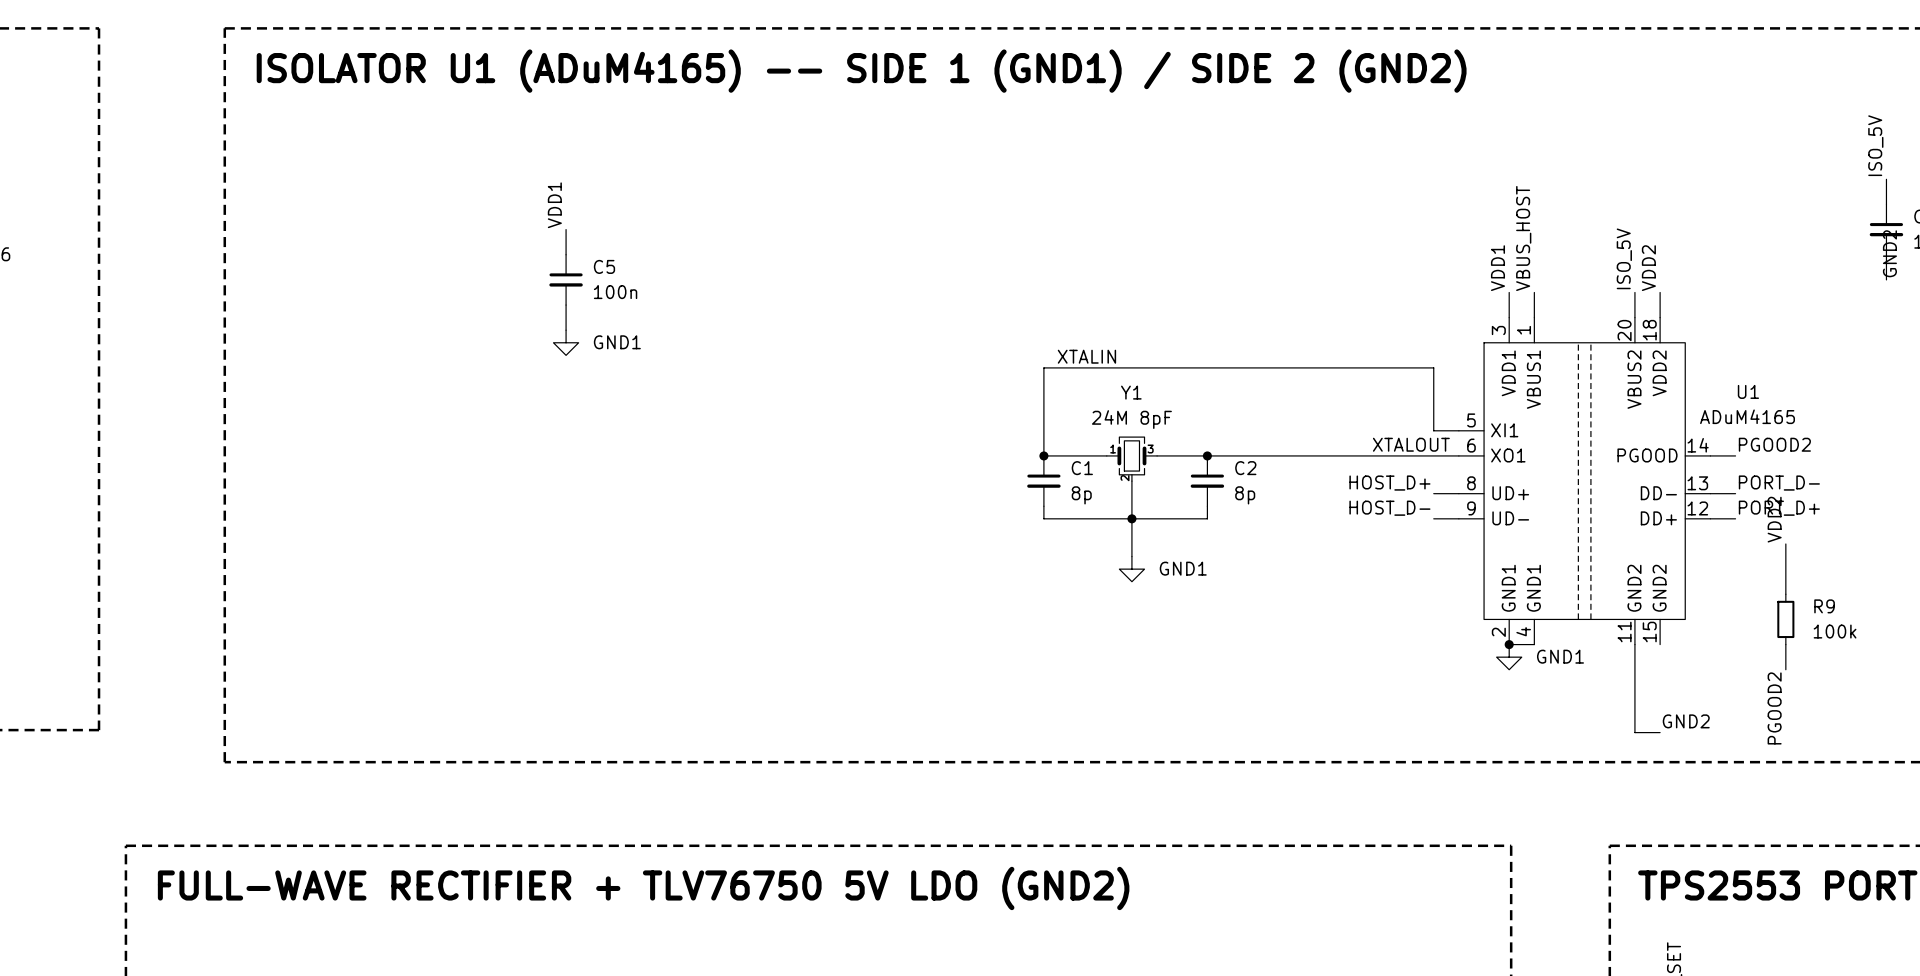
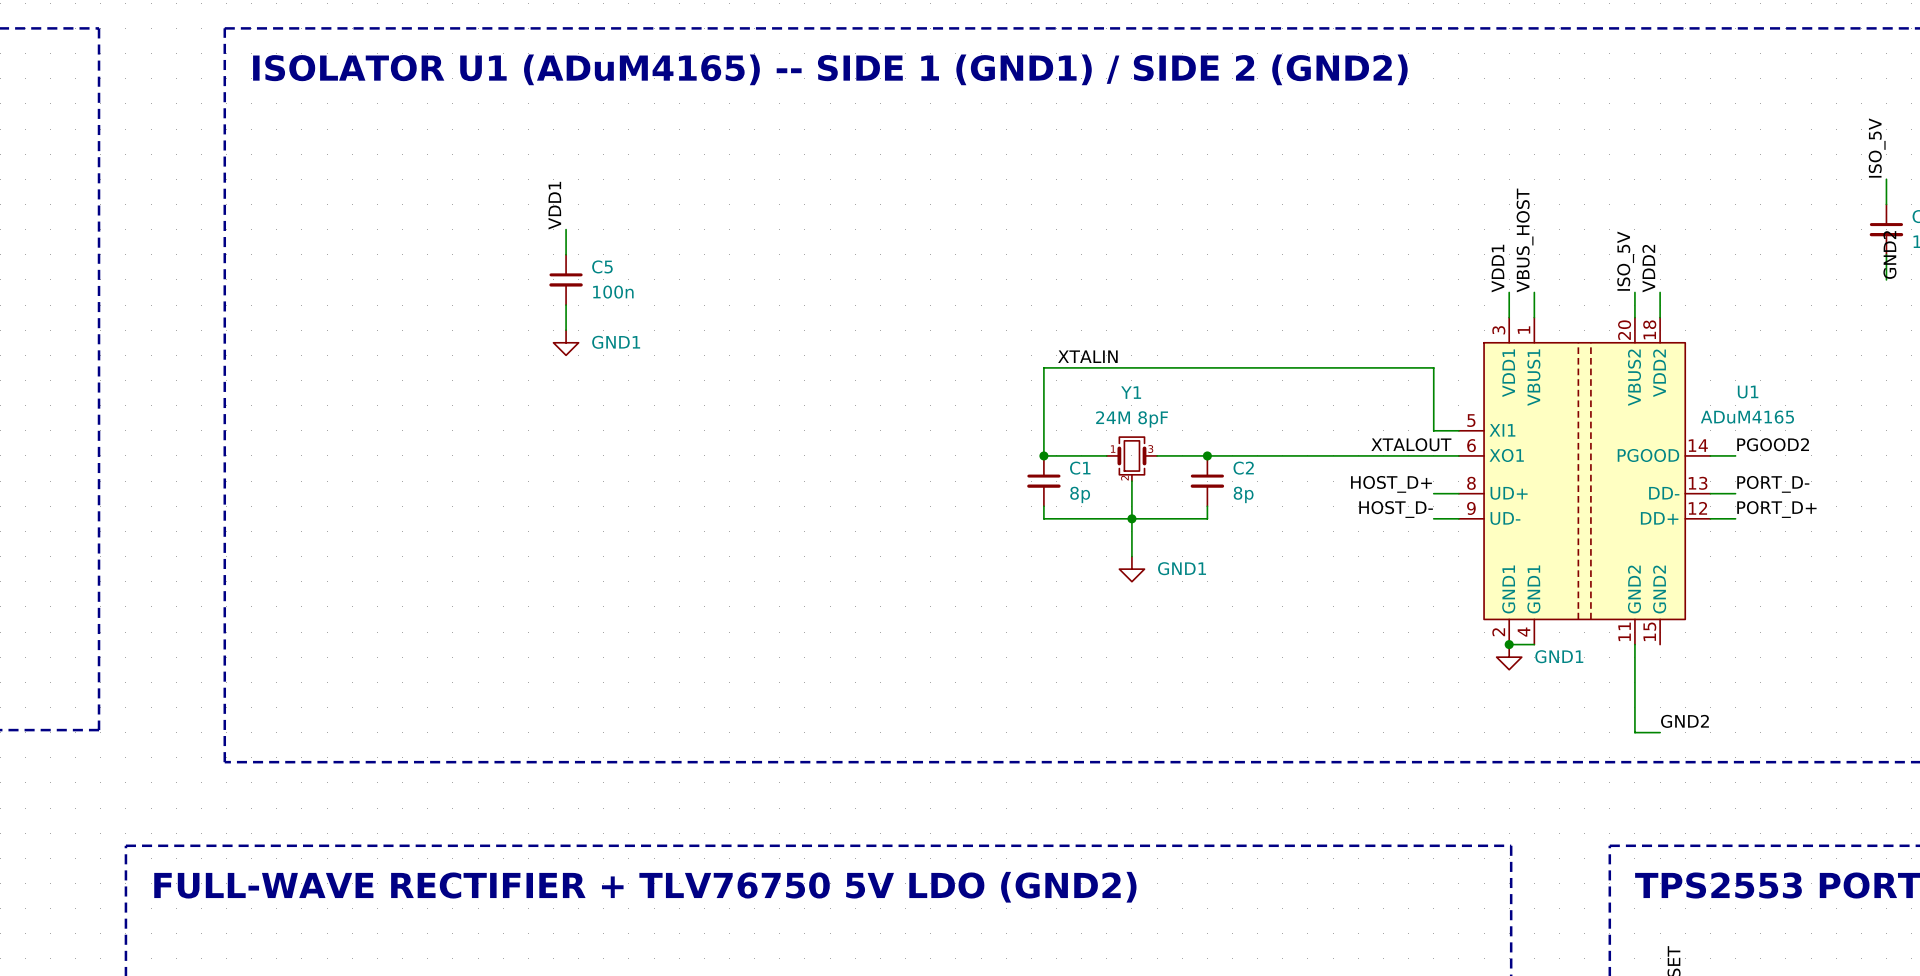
label: VDD2 (1774, 519) -> none
wire: (1785, 543) (1785, 594) -> none
R9: 100k (1785, 619) -> none
wire: (1785, 644) (1785, 669) -> none
label: PGOOD2 (1774, 708) -> none

